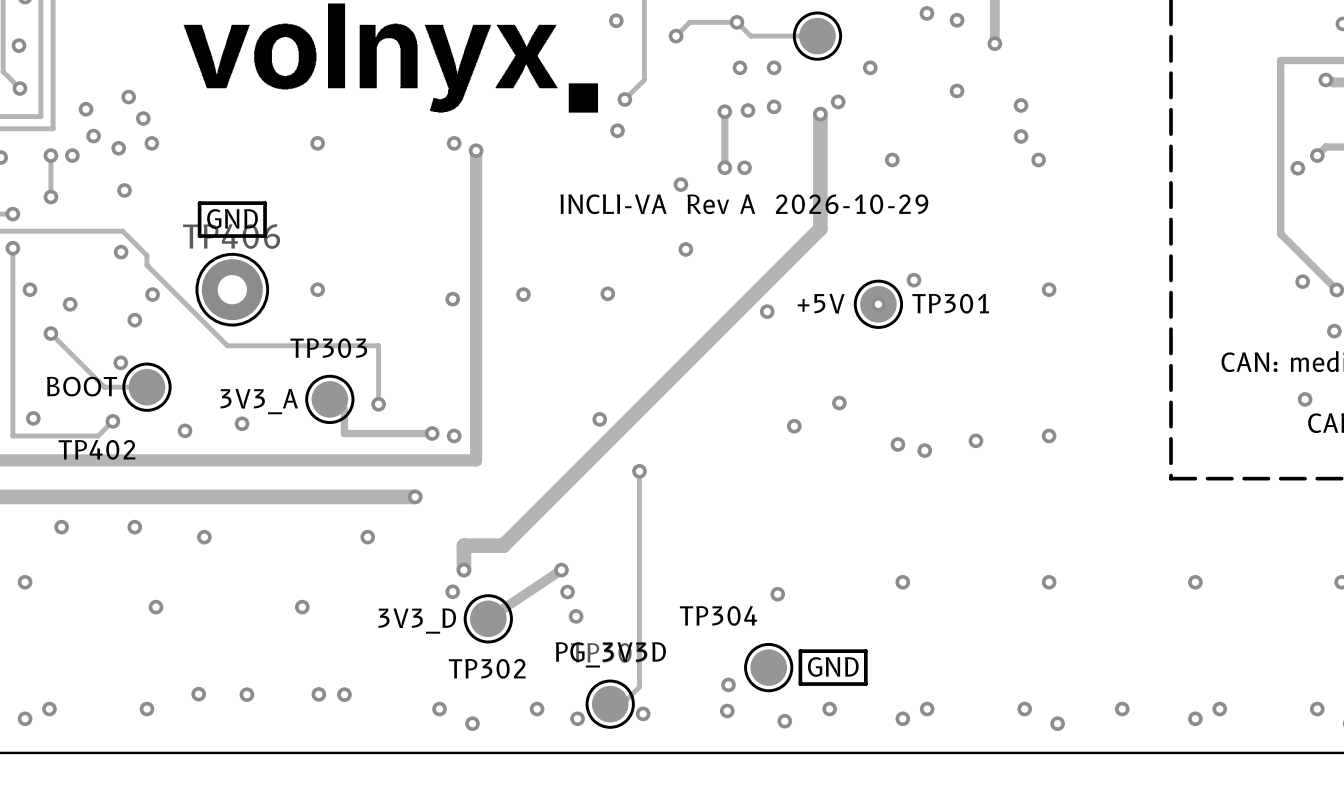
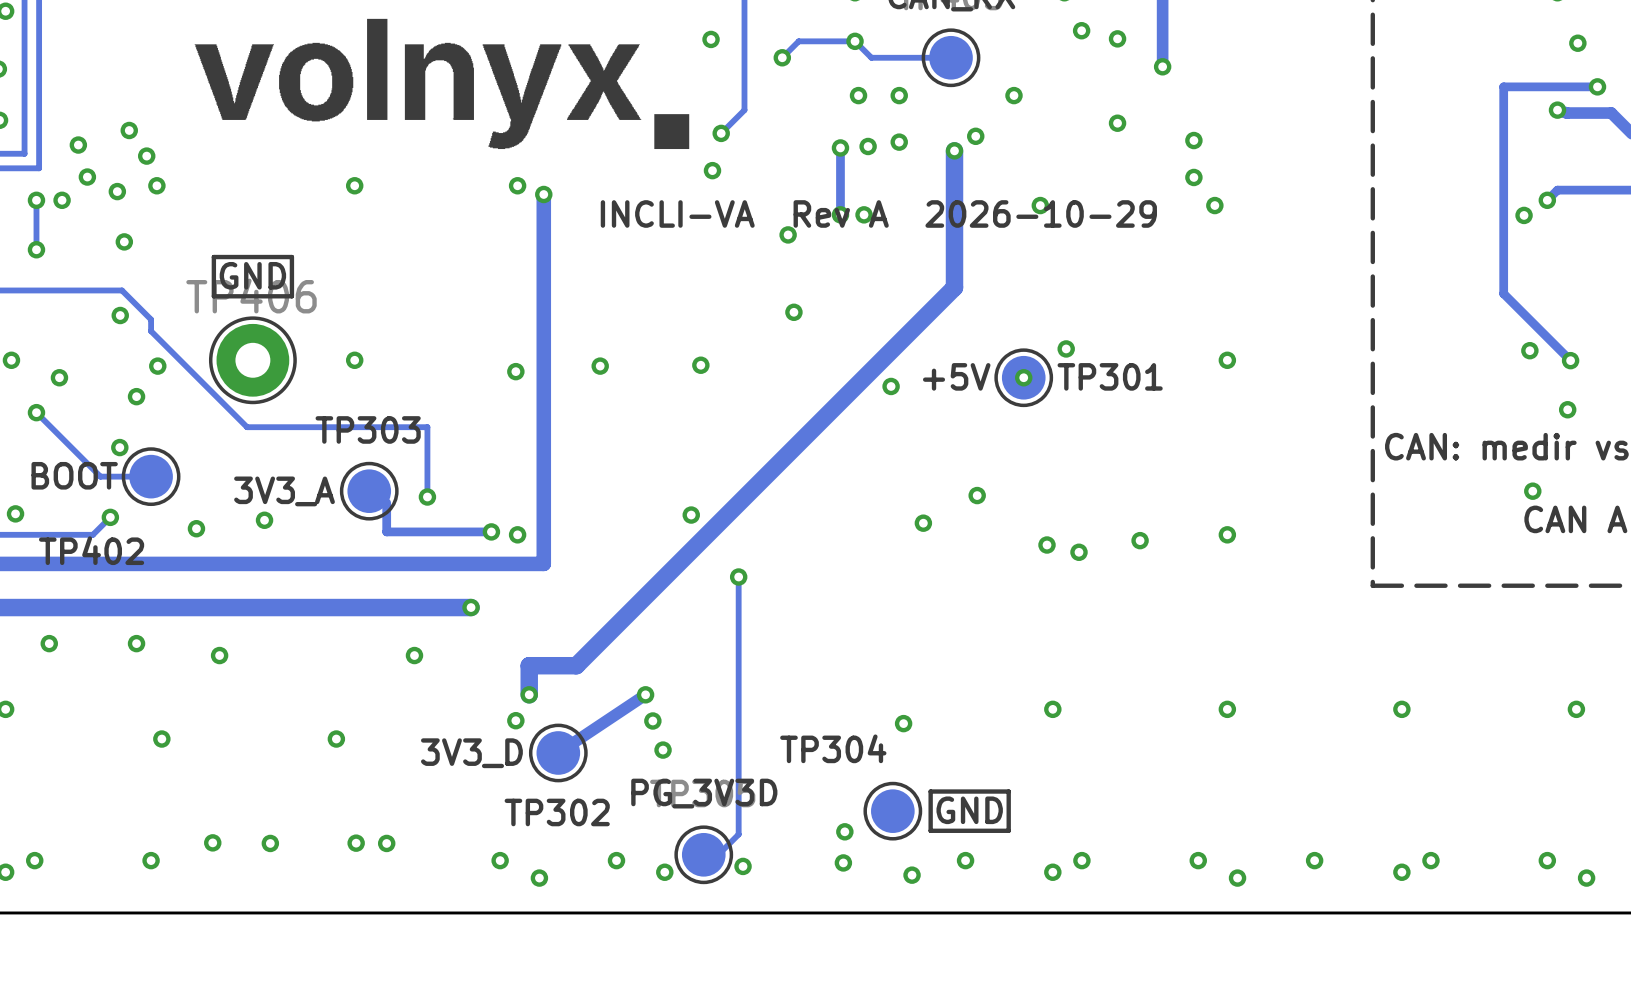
text position: INCLI-VA Rev A 2026-10-29 (744, 204) -> INCLI-VA Rev A 2026-10-29 (878, 213)

